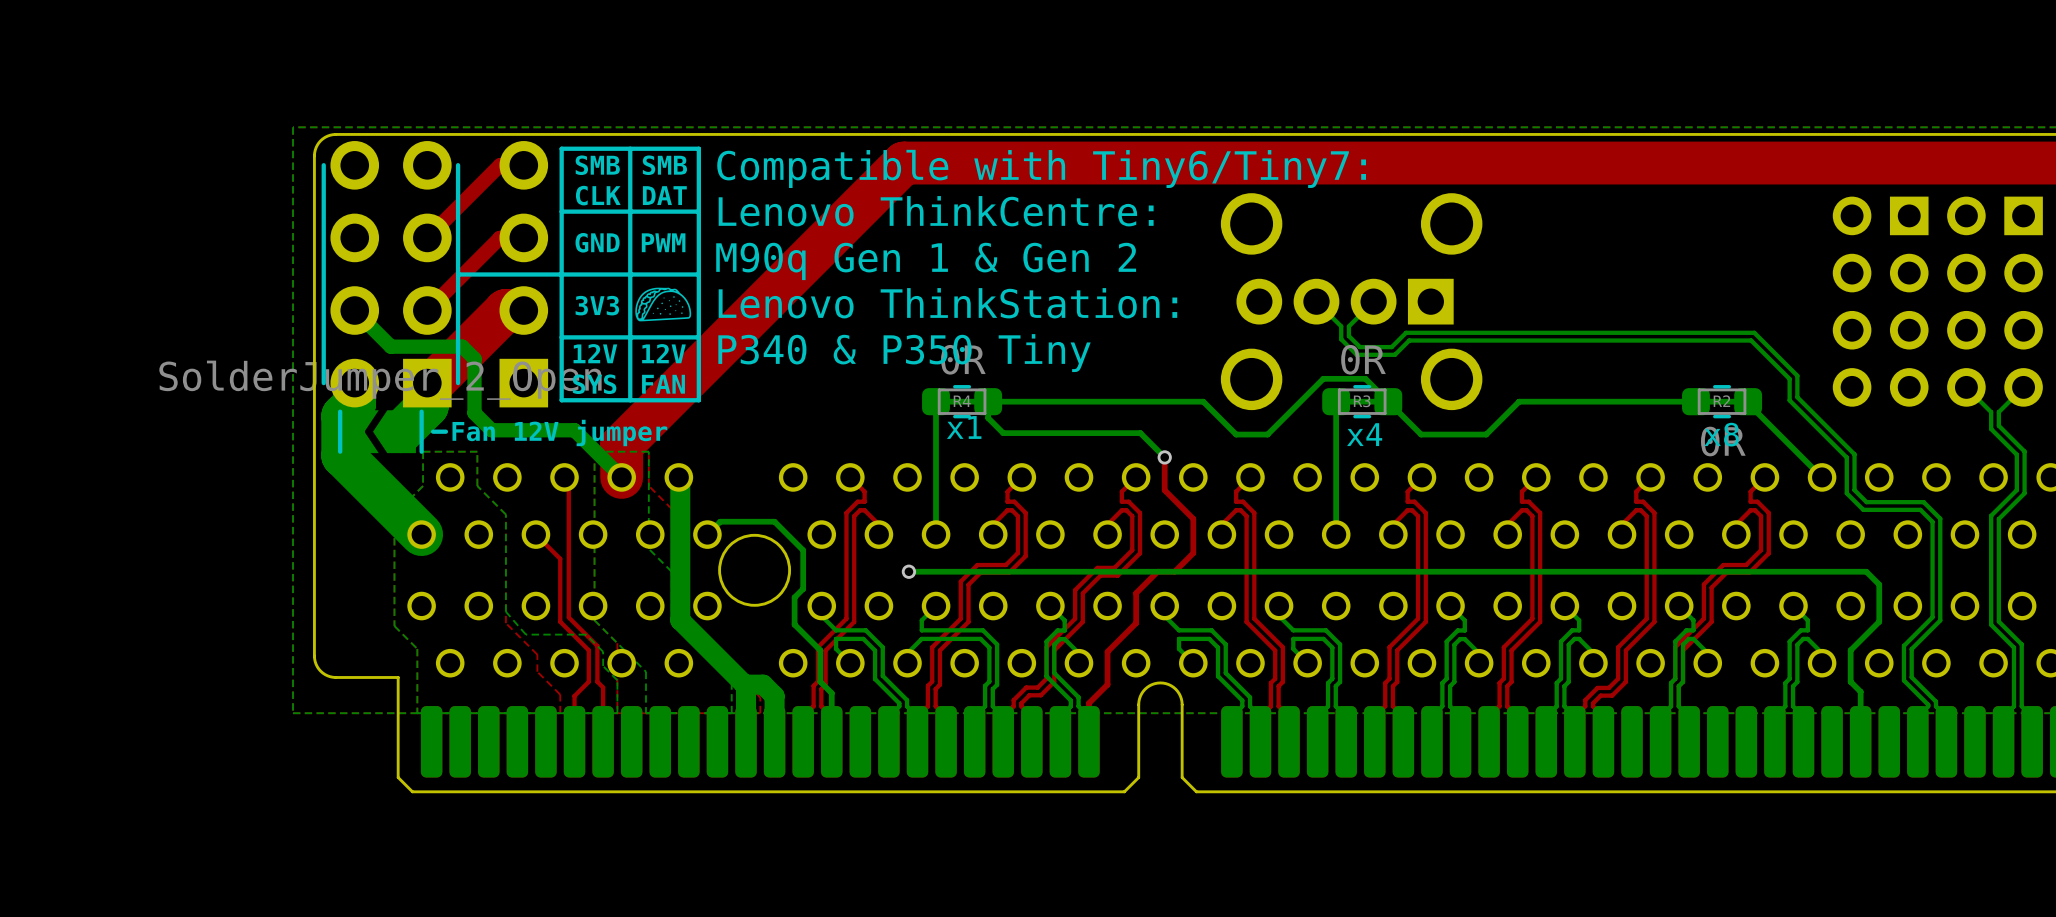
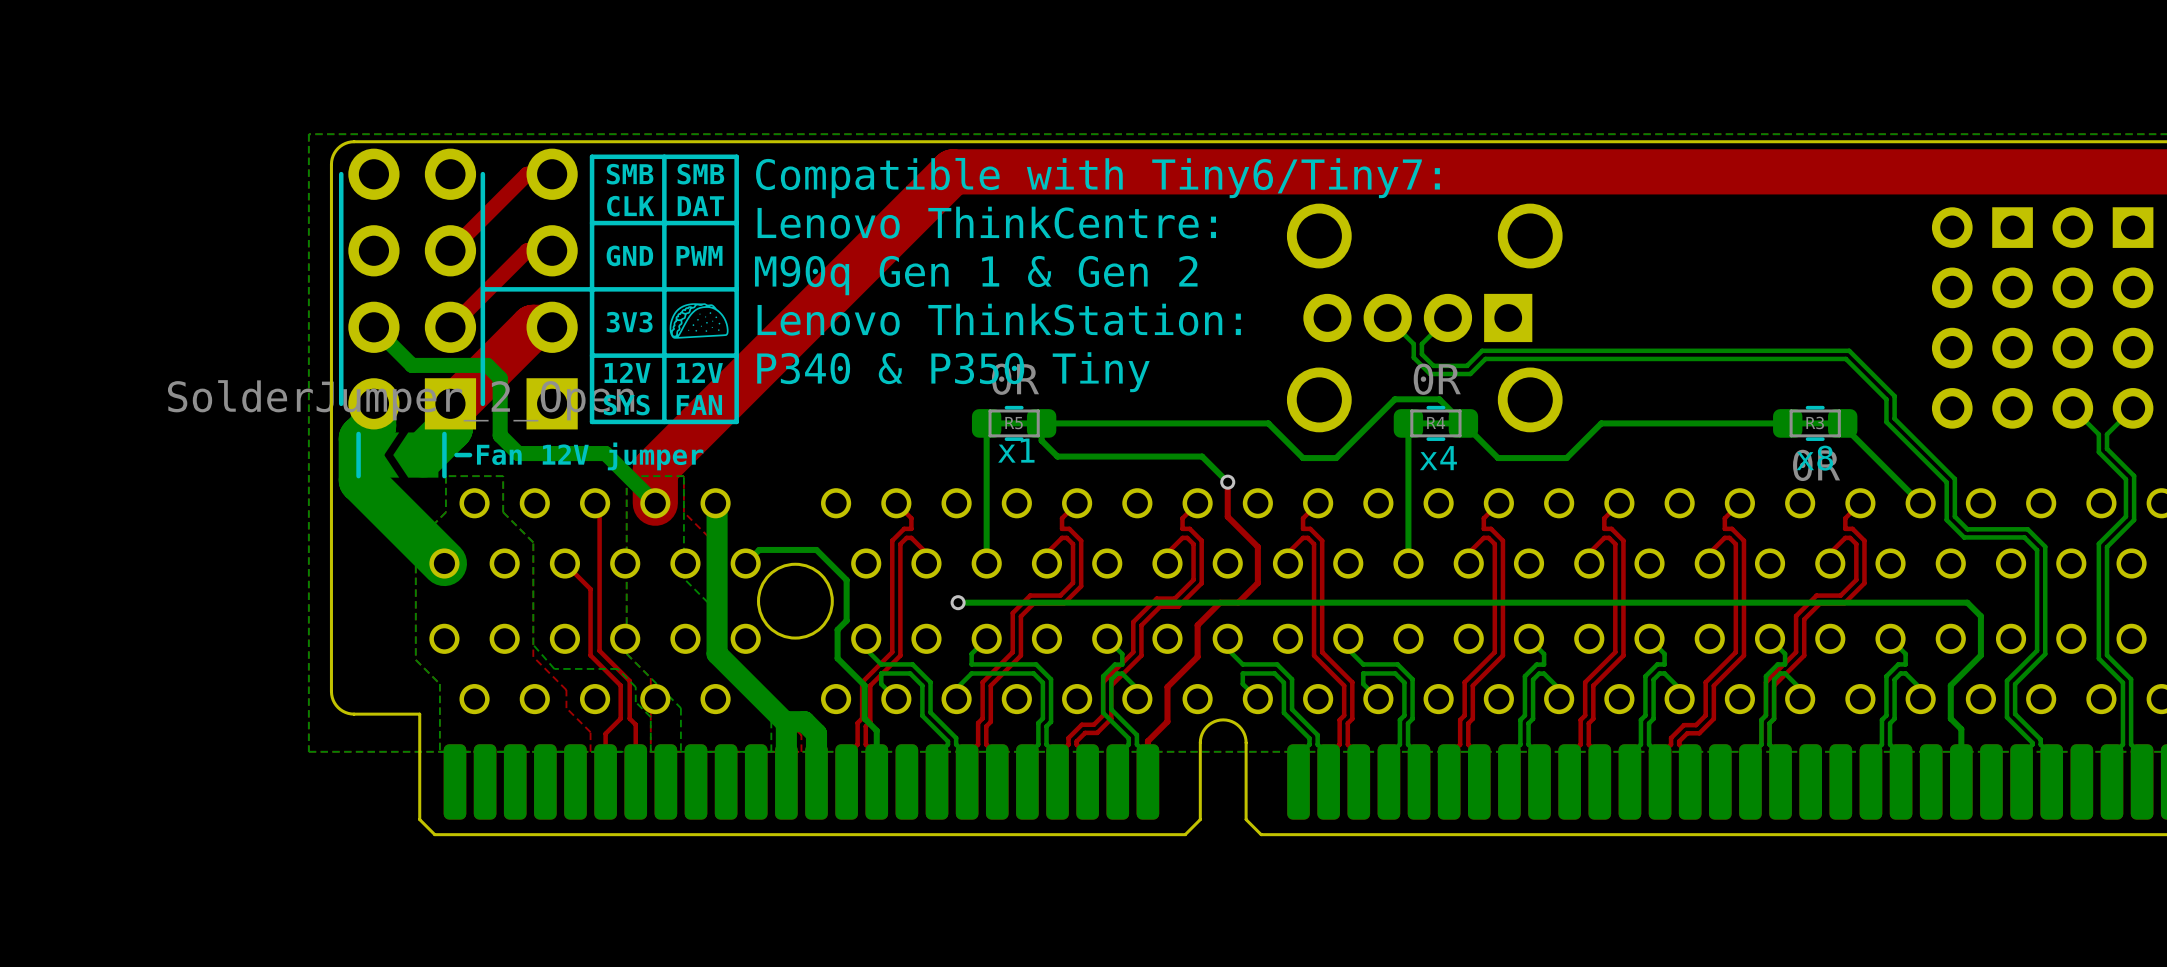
R4 name: R4 (962, 401) -> R5 (1014, 423)
R3 name: R3 (1362, 401) -> R4 (1436, 422)
R2 name: R2 (1721, 401) -> R3 (1815, 422)

